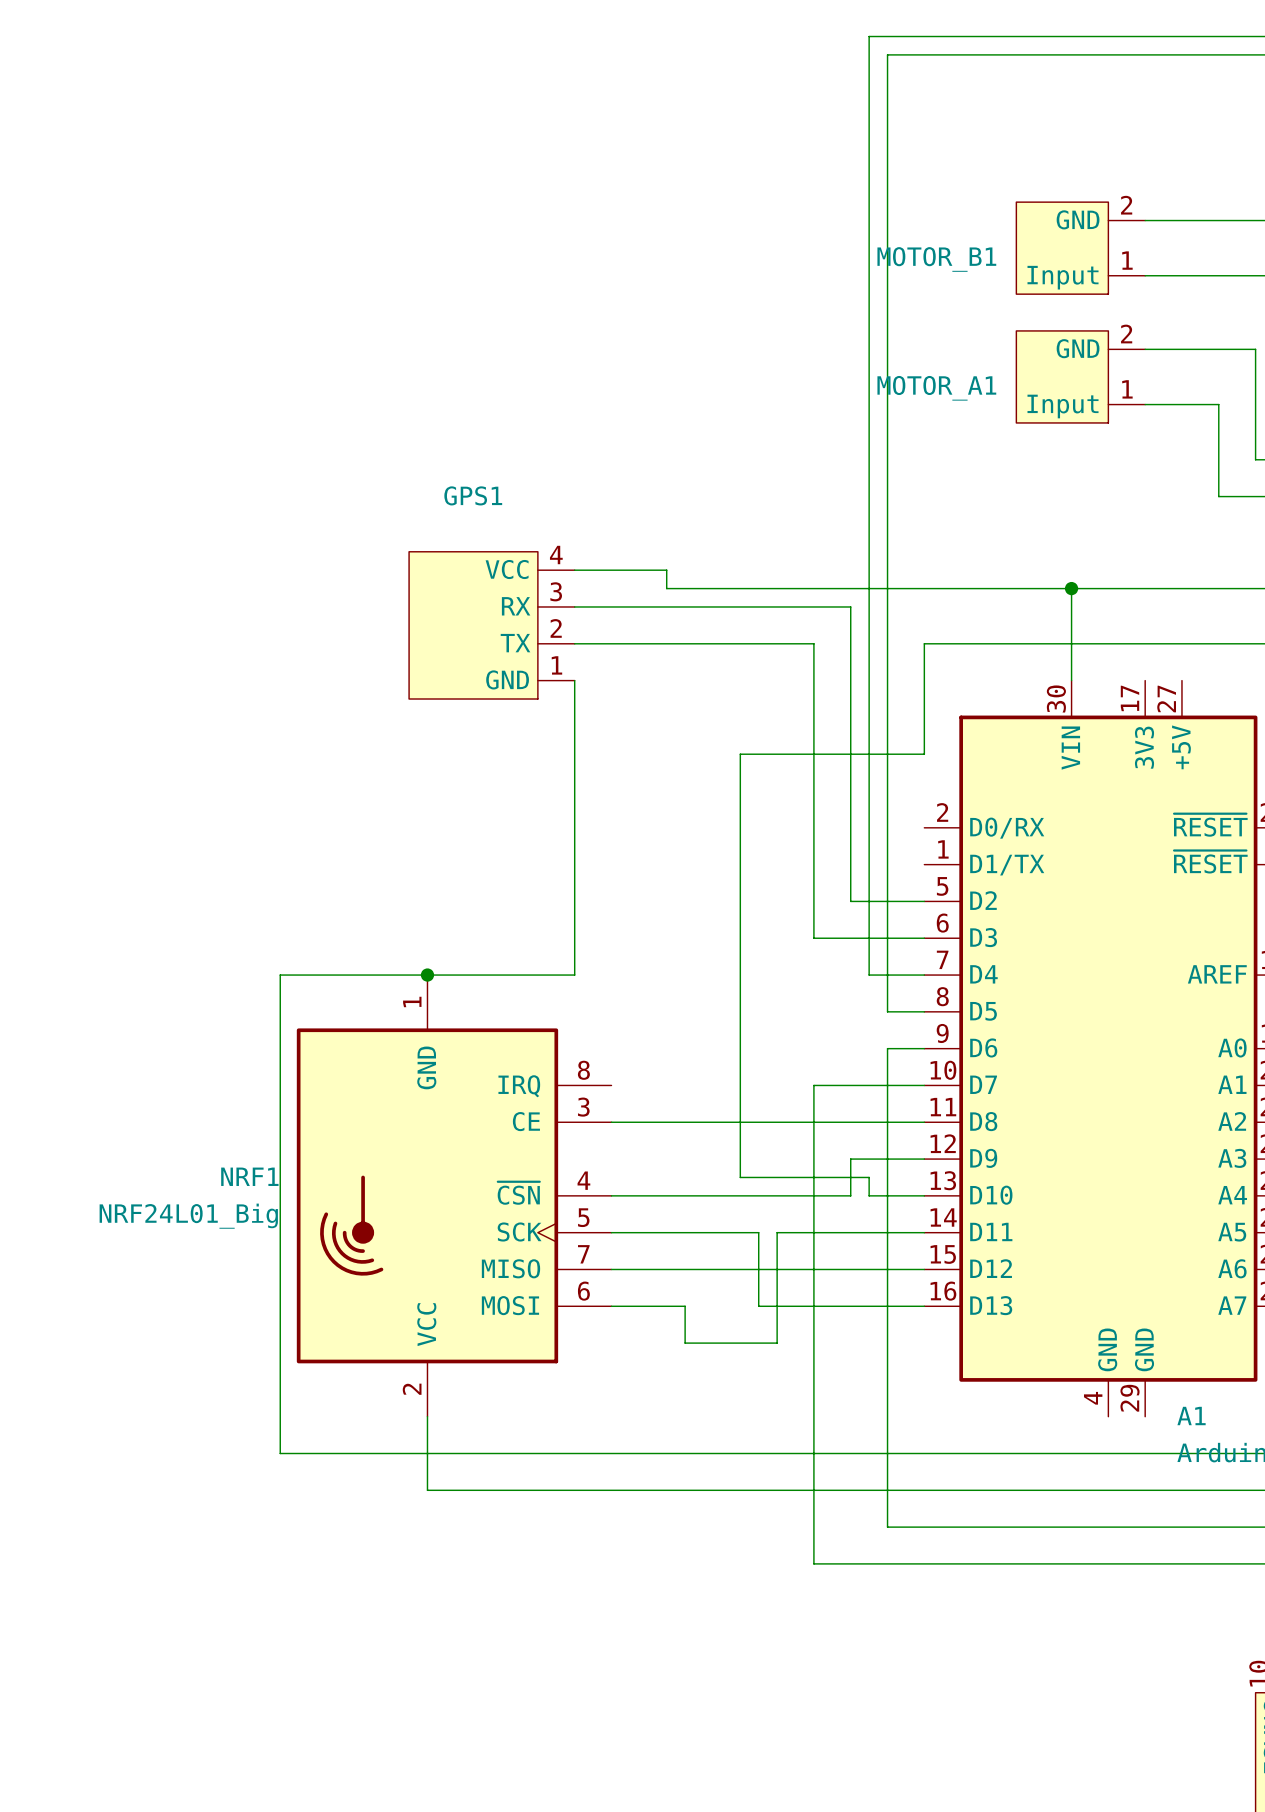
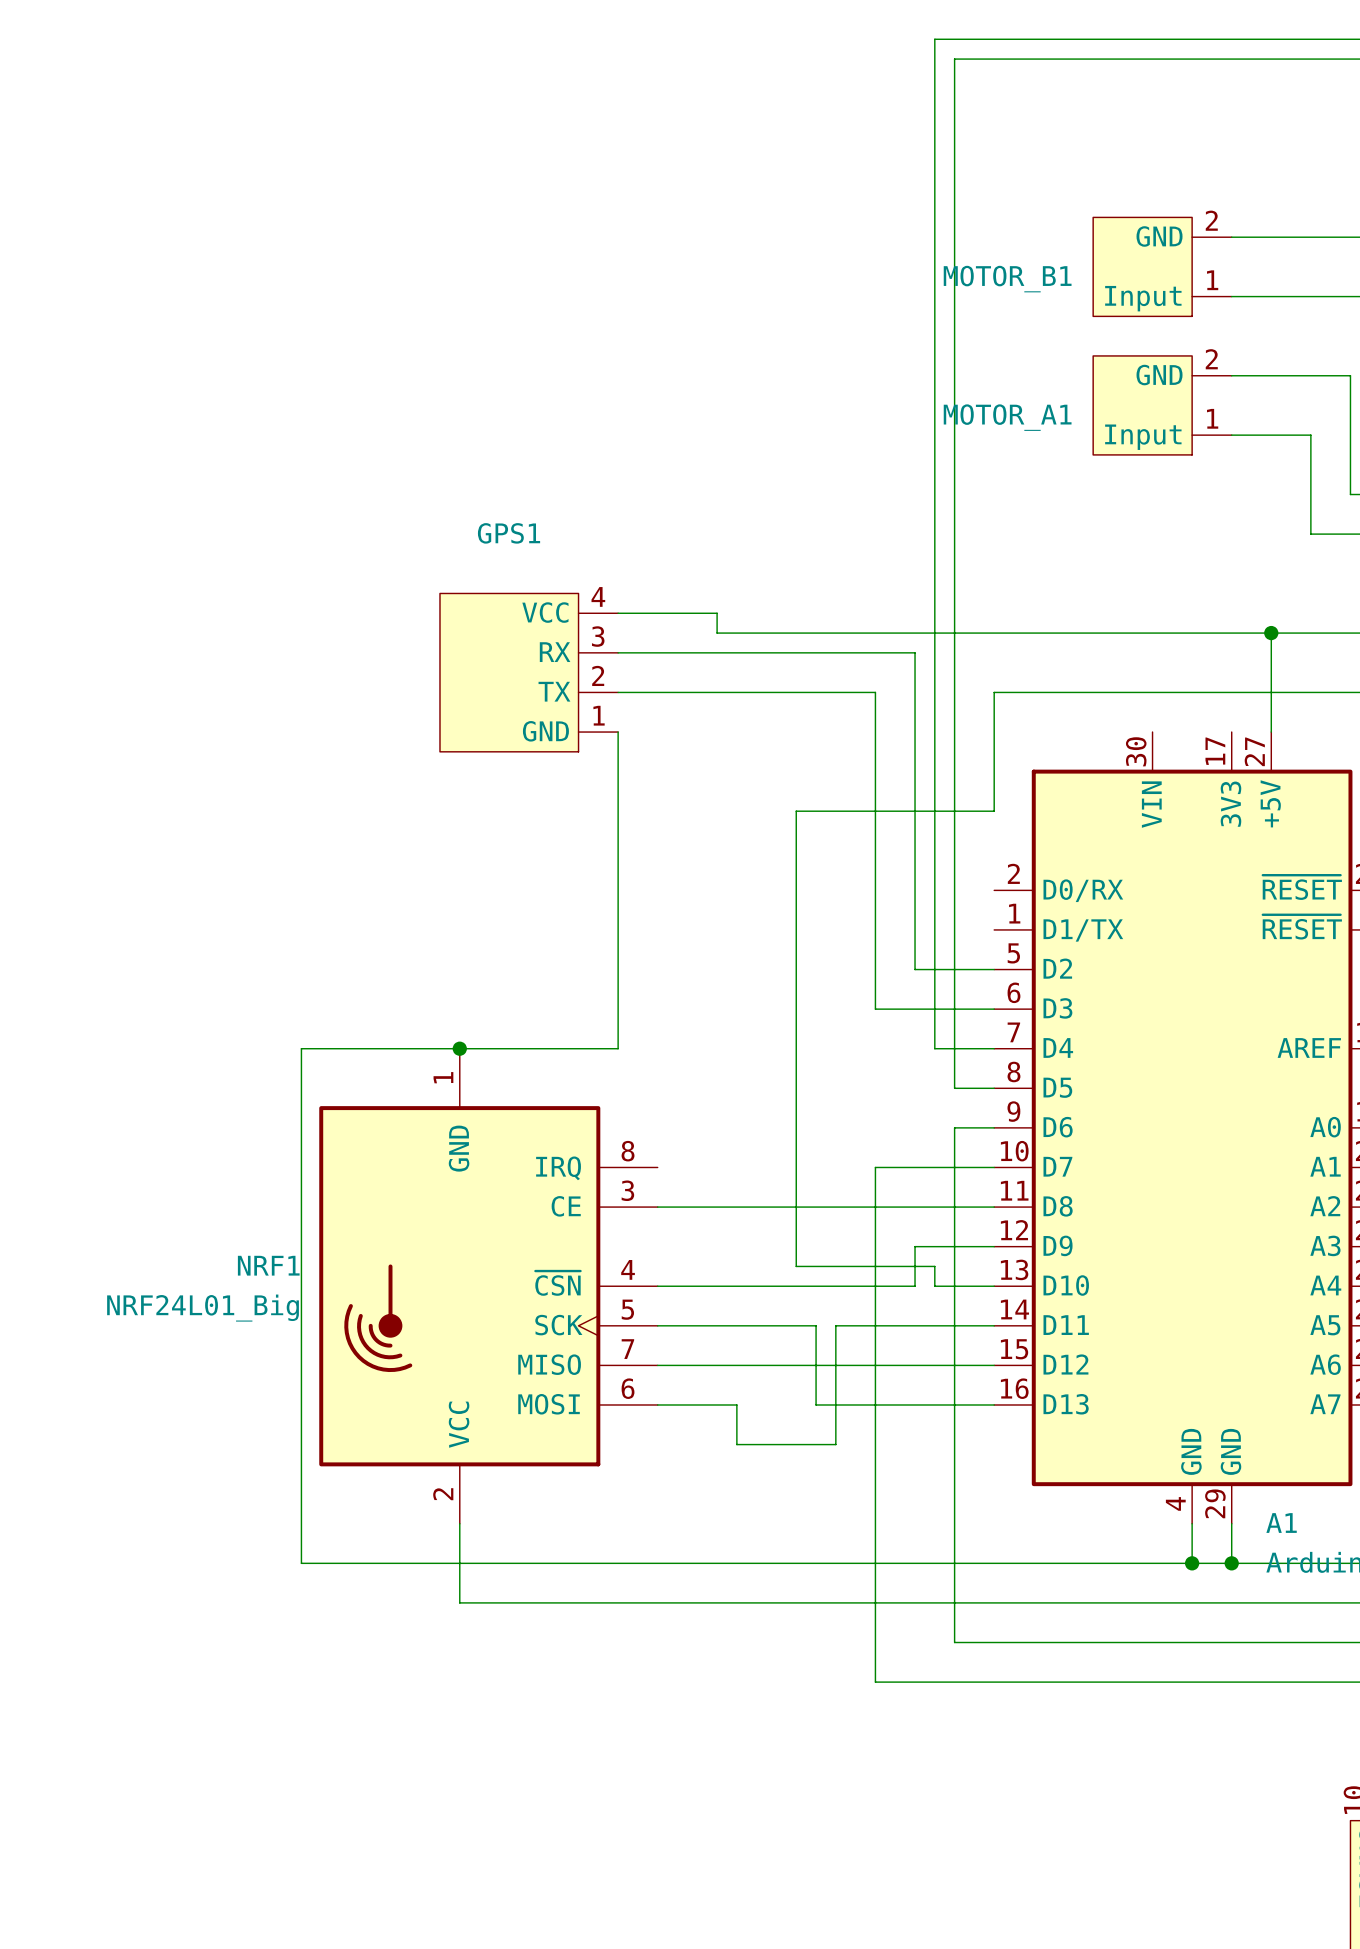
wire: (1071, 588) (1071, 680) -> (1271, 633) (1271, 732)
junction: (1071, 588) -> none
junction: none -> (1271, 633)
wire: none -> (1192, 1523) (1192, 1563)
wire: none -> (1231, 1523) (1231, 1563)
junction: none -> (1192, 1563)
junction: none -> (1231, 1563)

